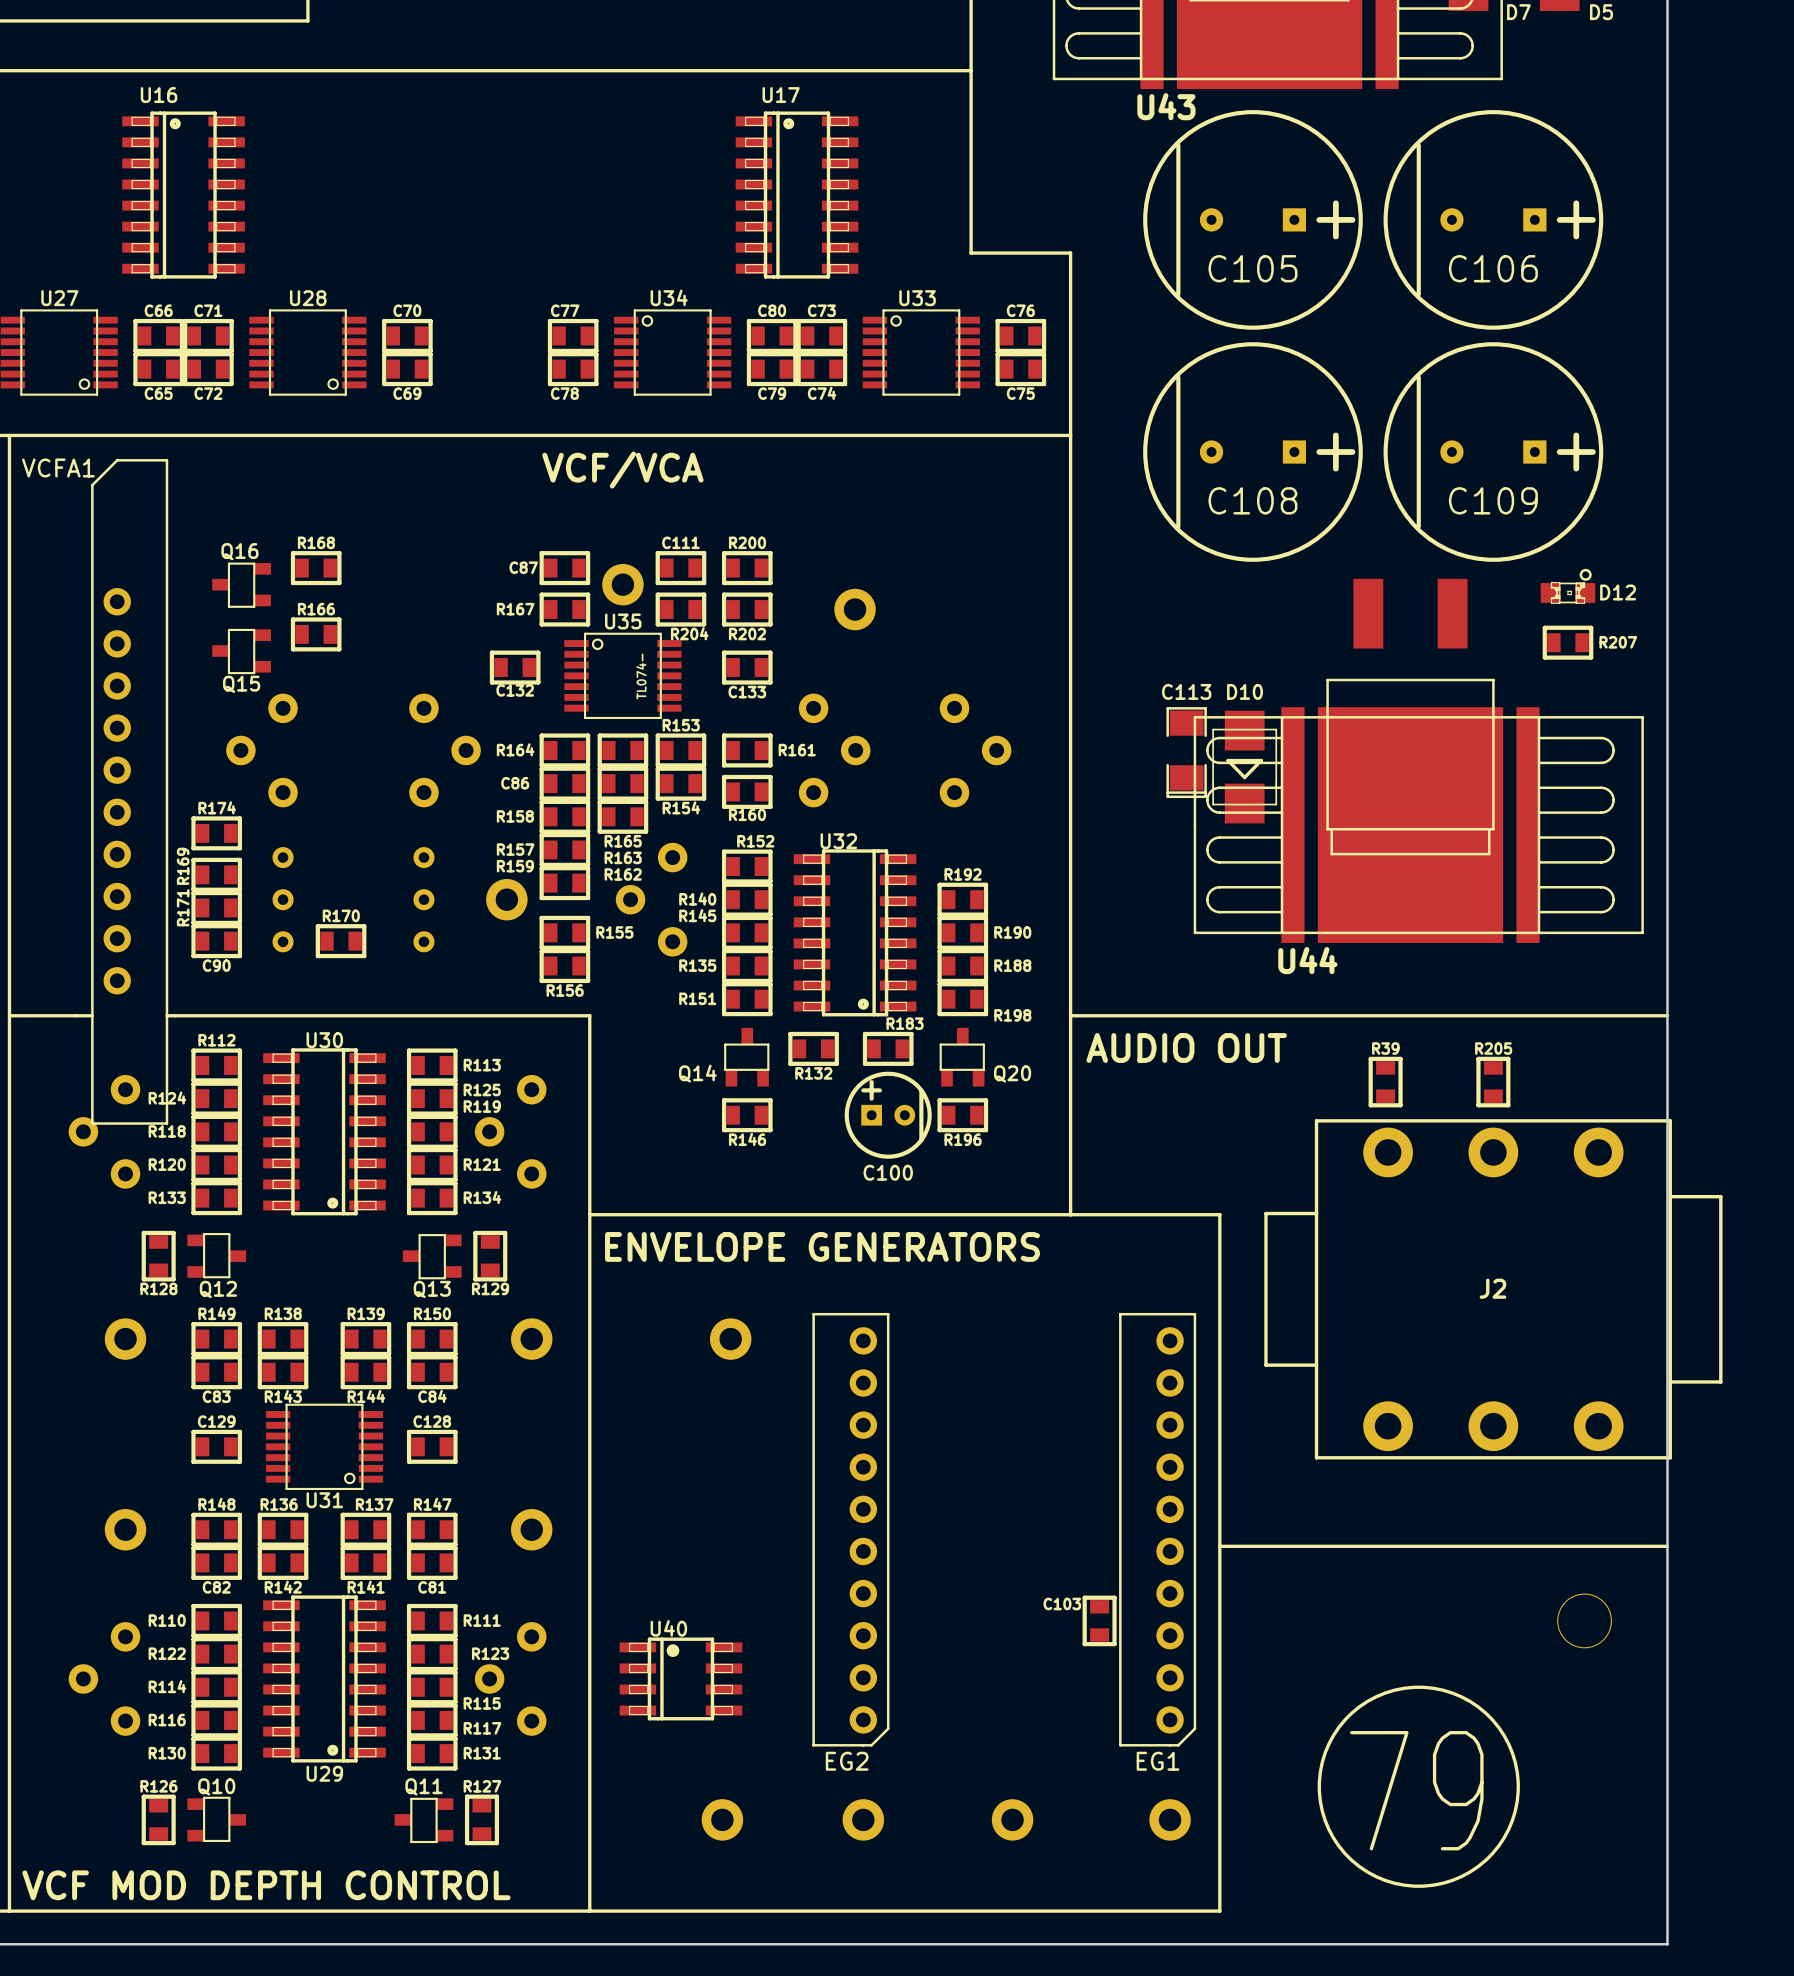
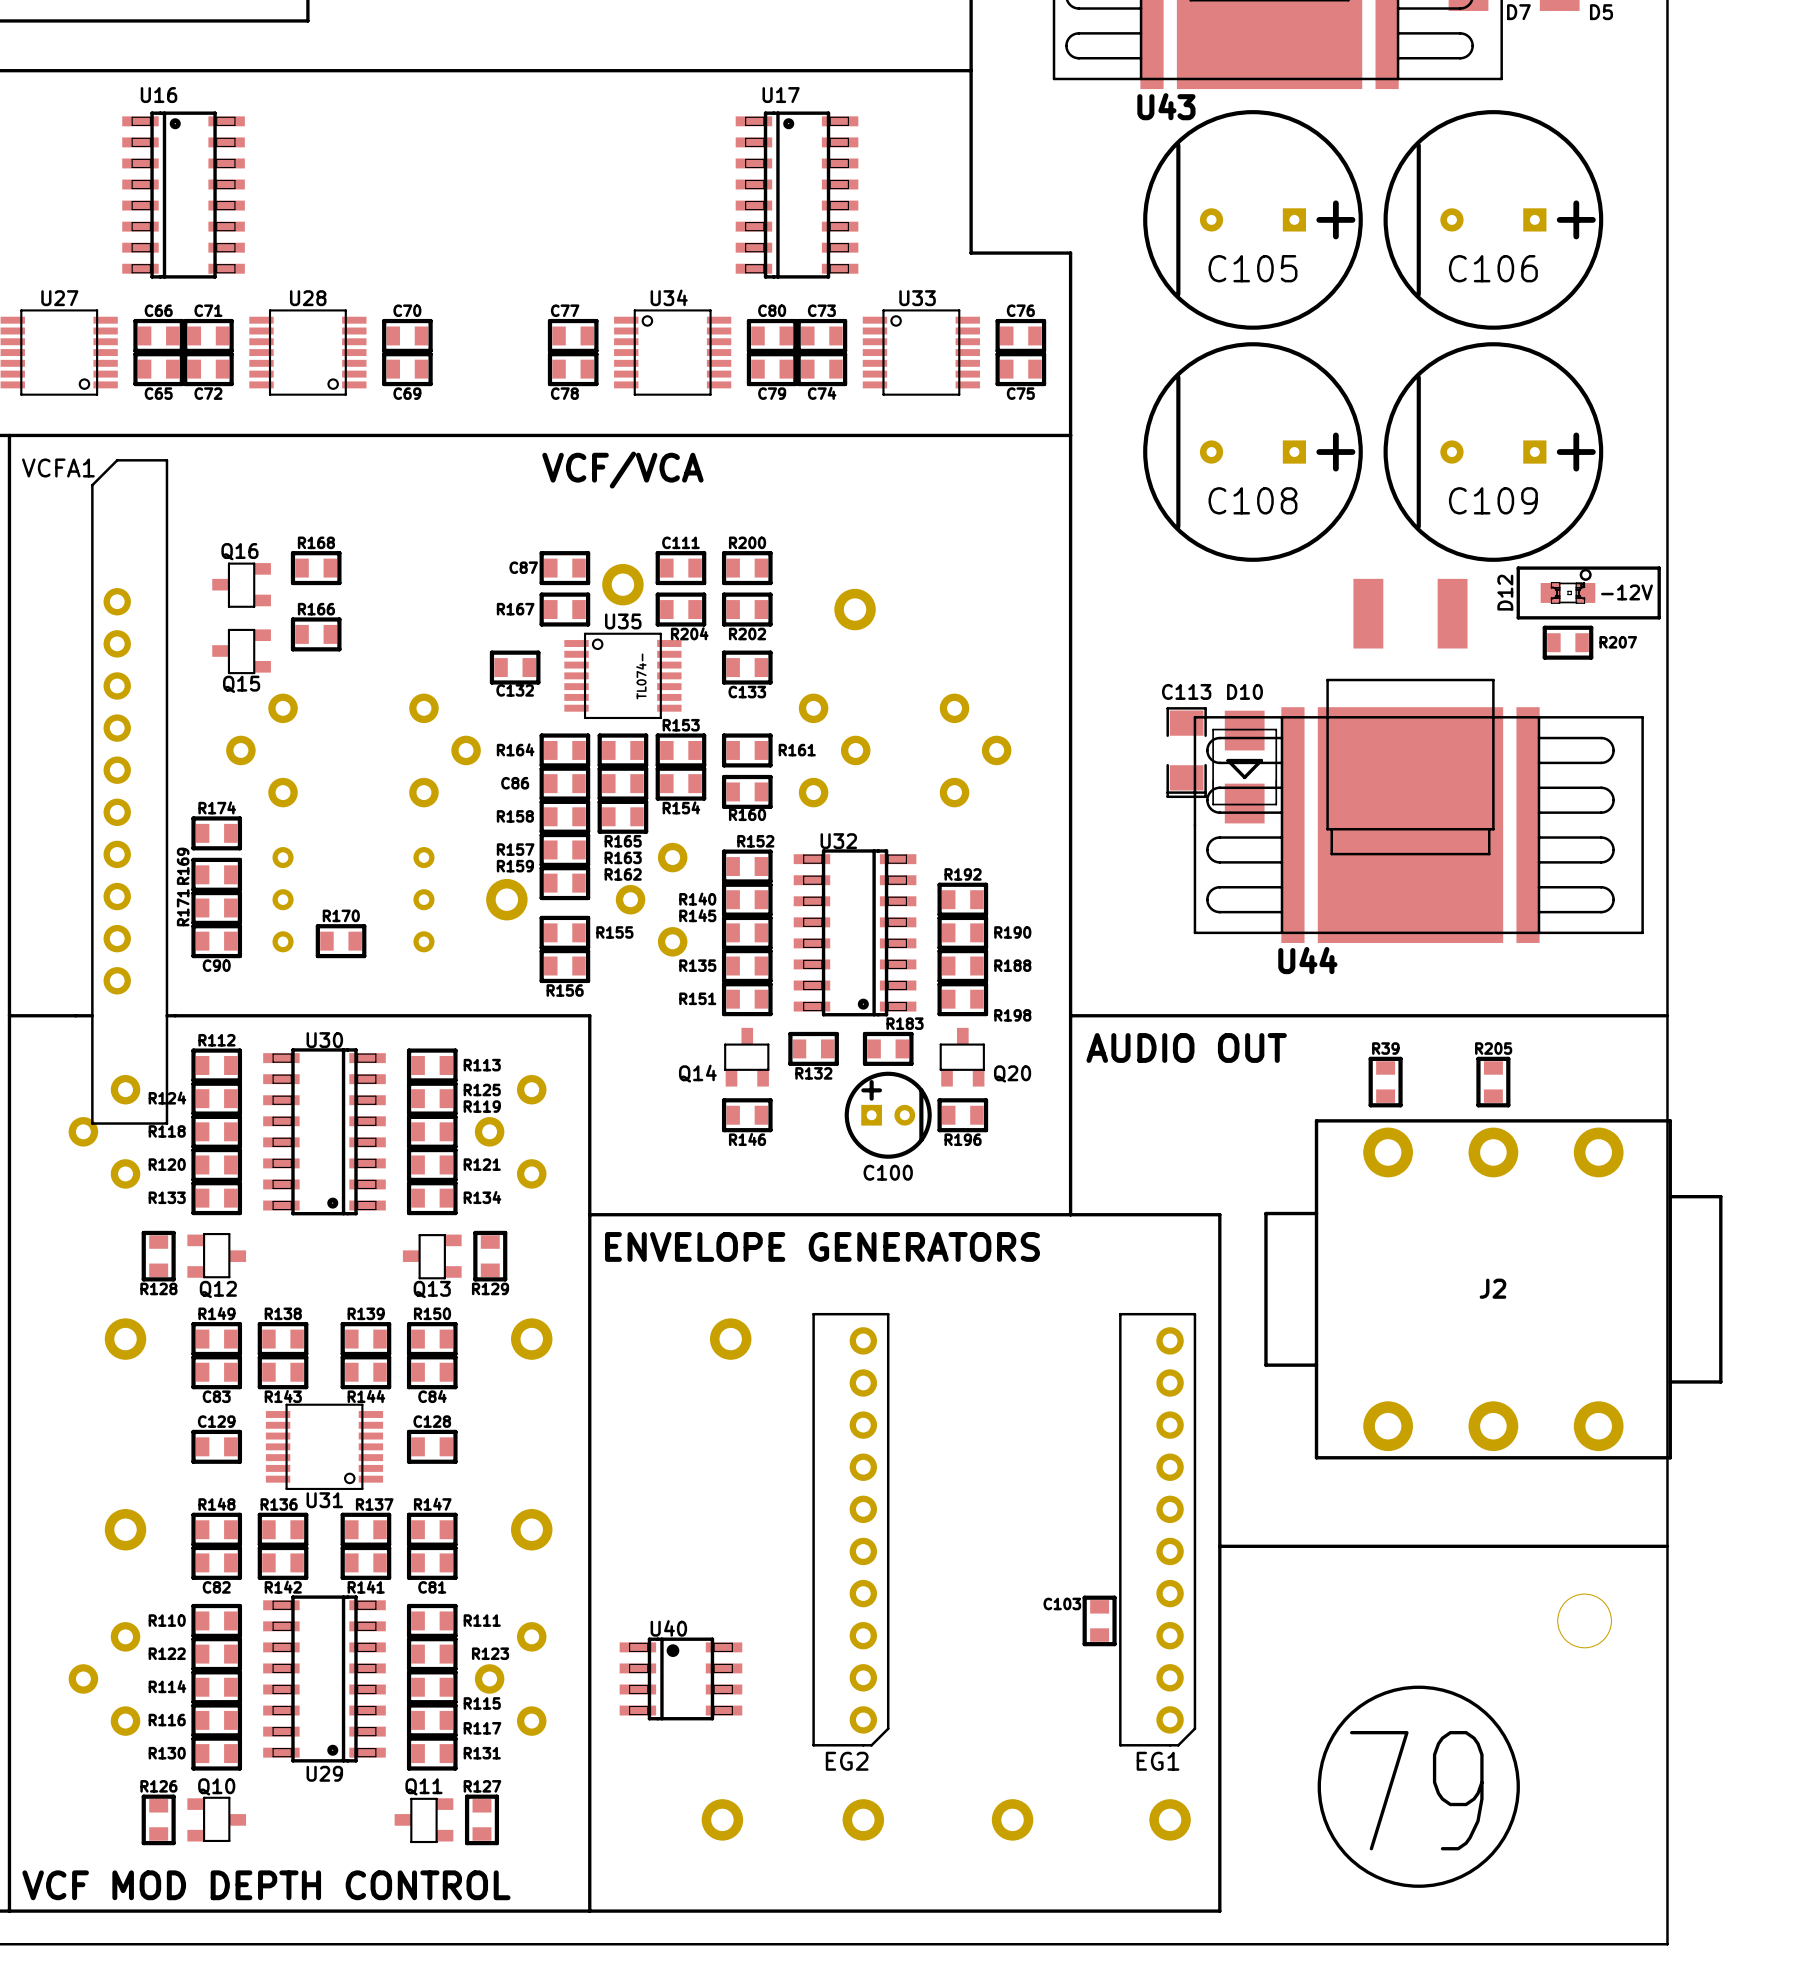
line: none -> (1518, 568) (1659, 568) (1659, 617) (1518, 617) (1518, 568)
D12 name rotation: 0° (1618, 592) -> 90° counterclockwise (1505, 592)
D12 name position: D12 (1618, 592) -> D12 (1505, 592)
text: none -> -12V (1626, 592)

